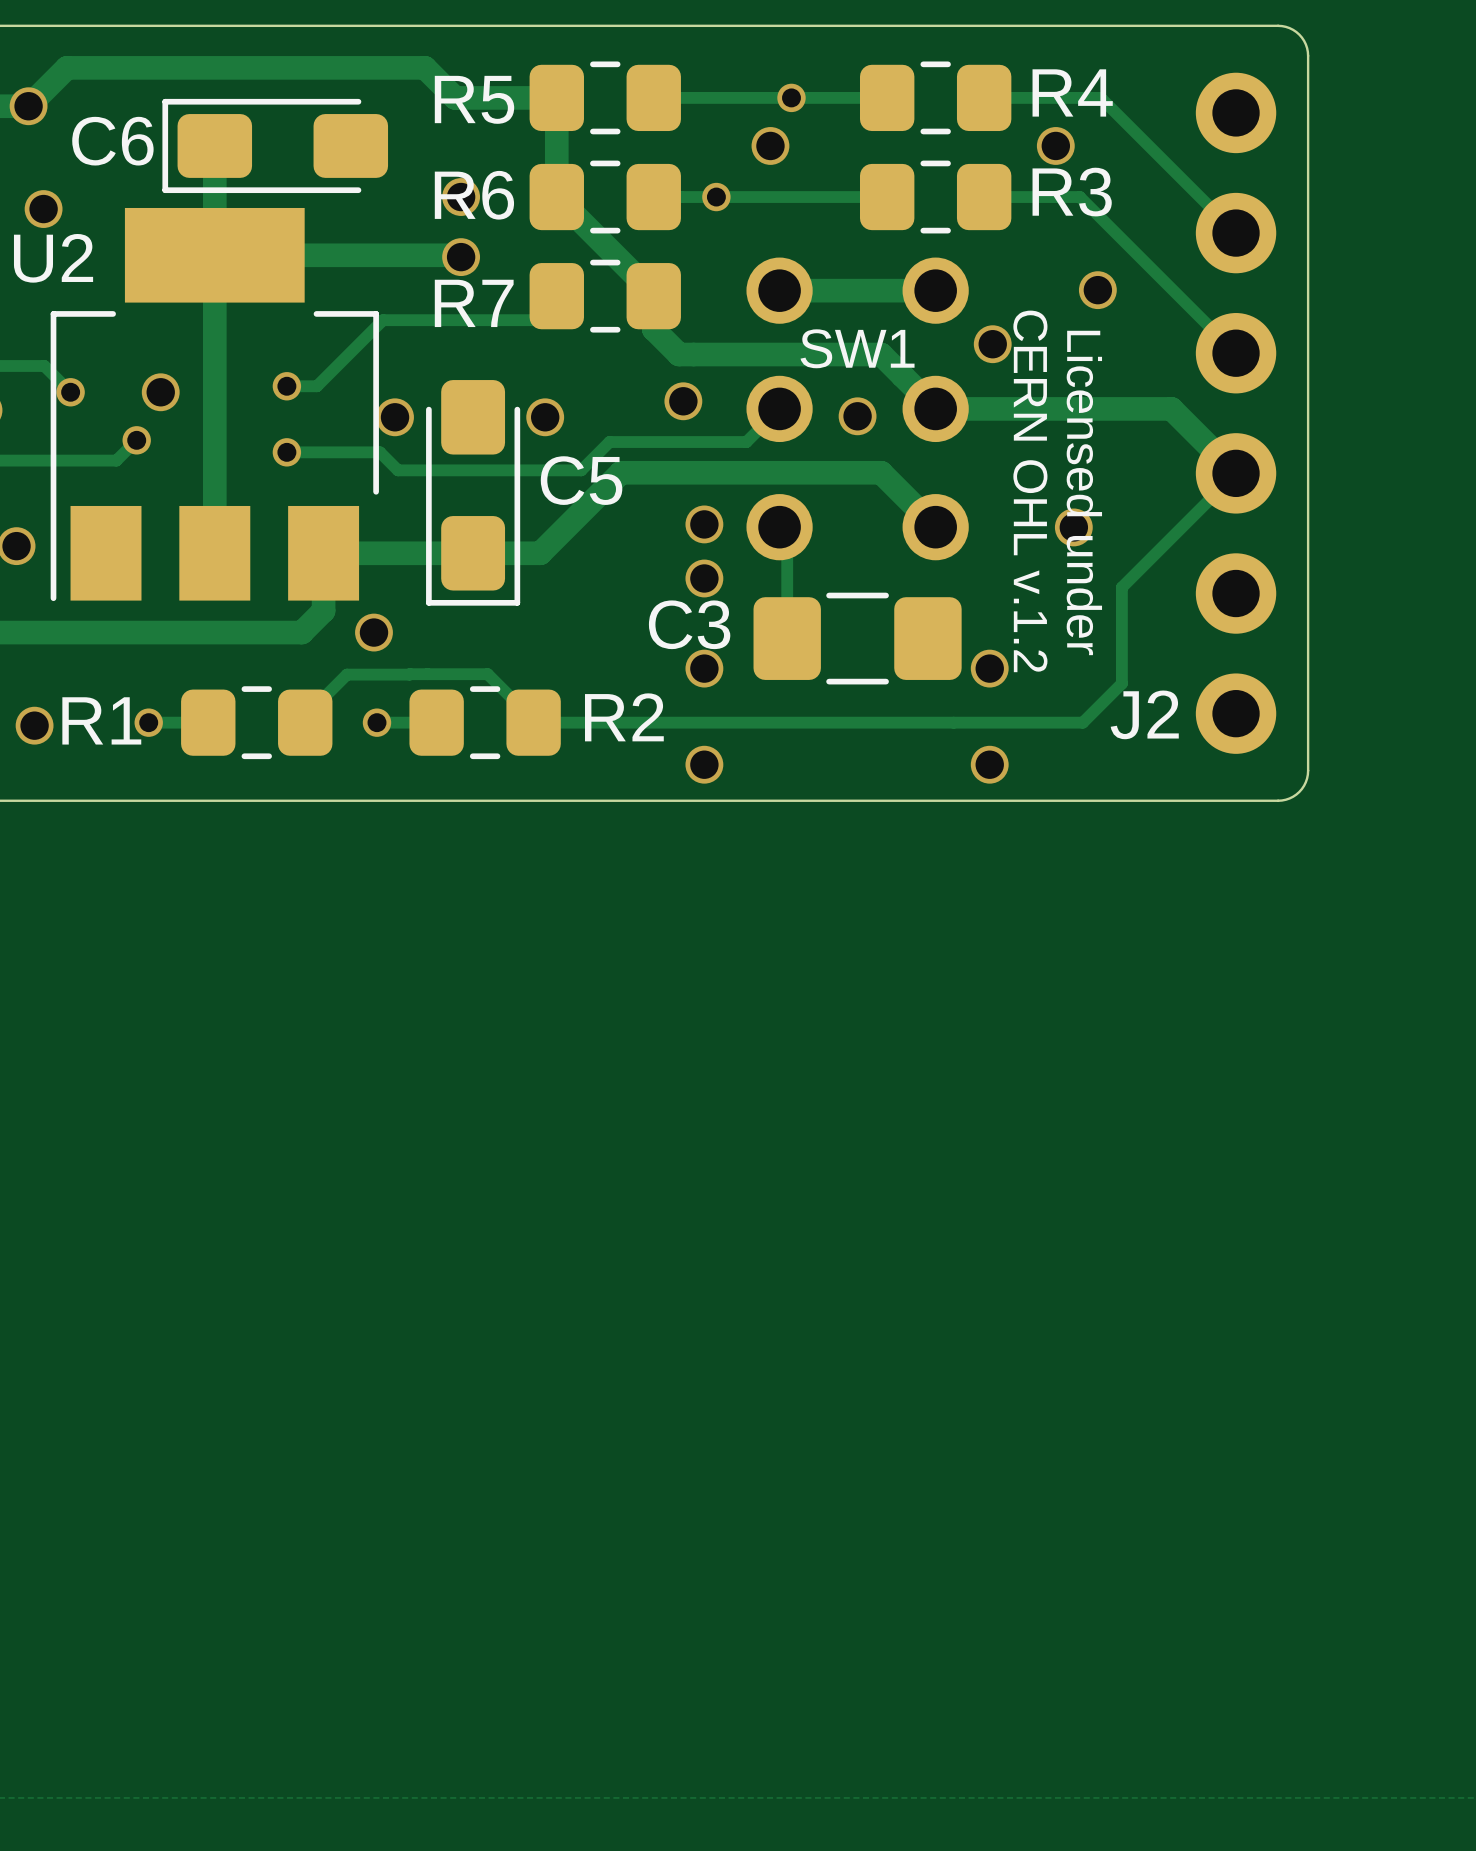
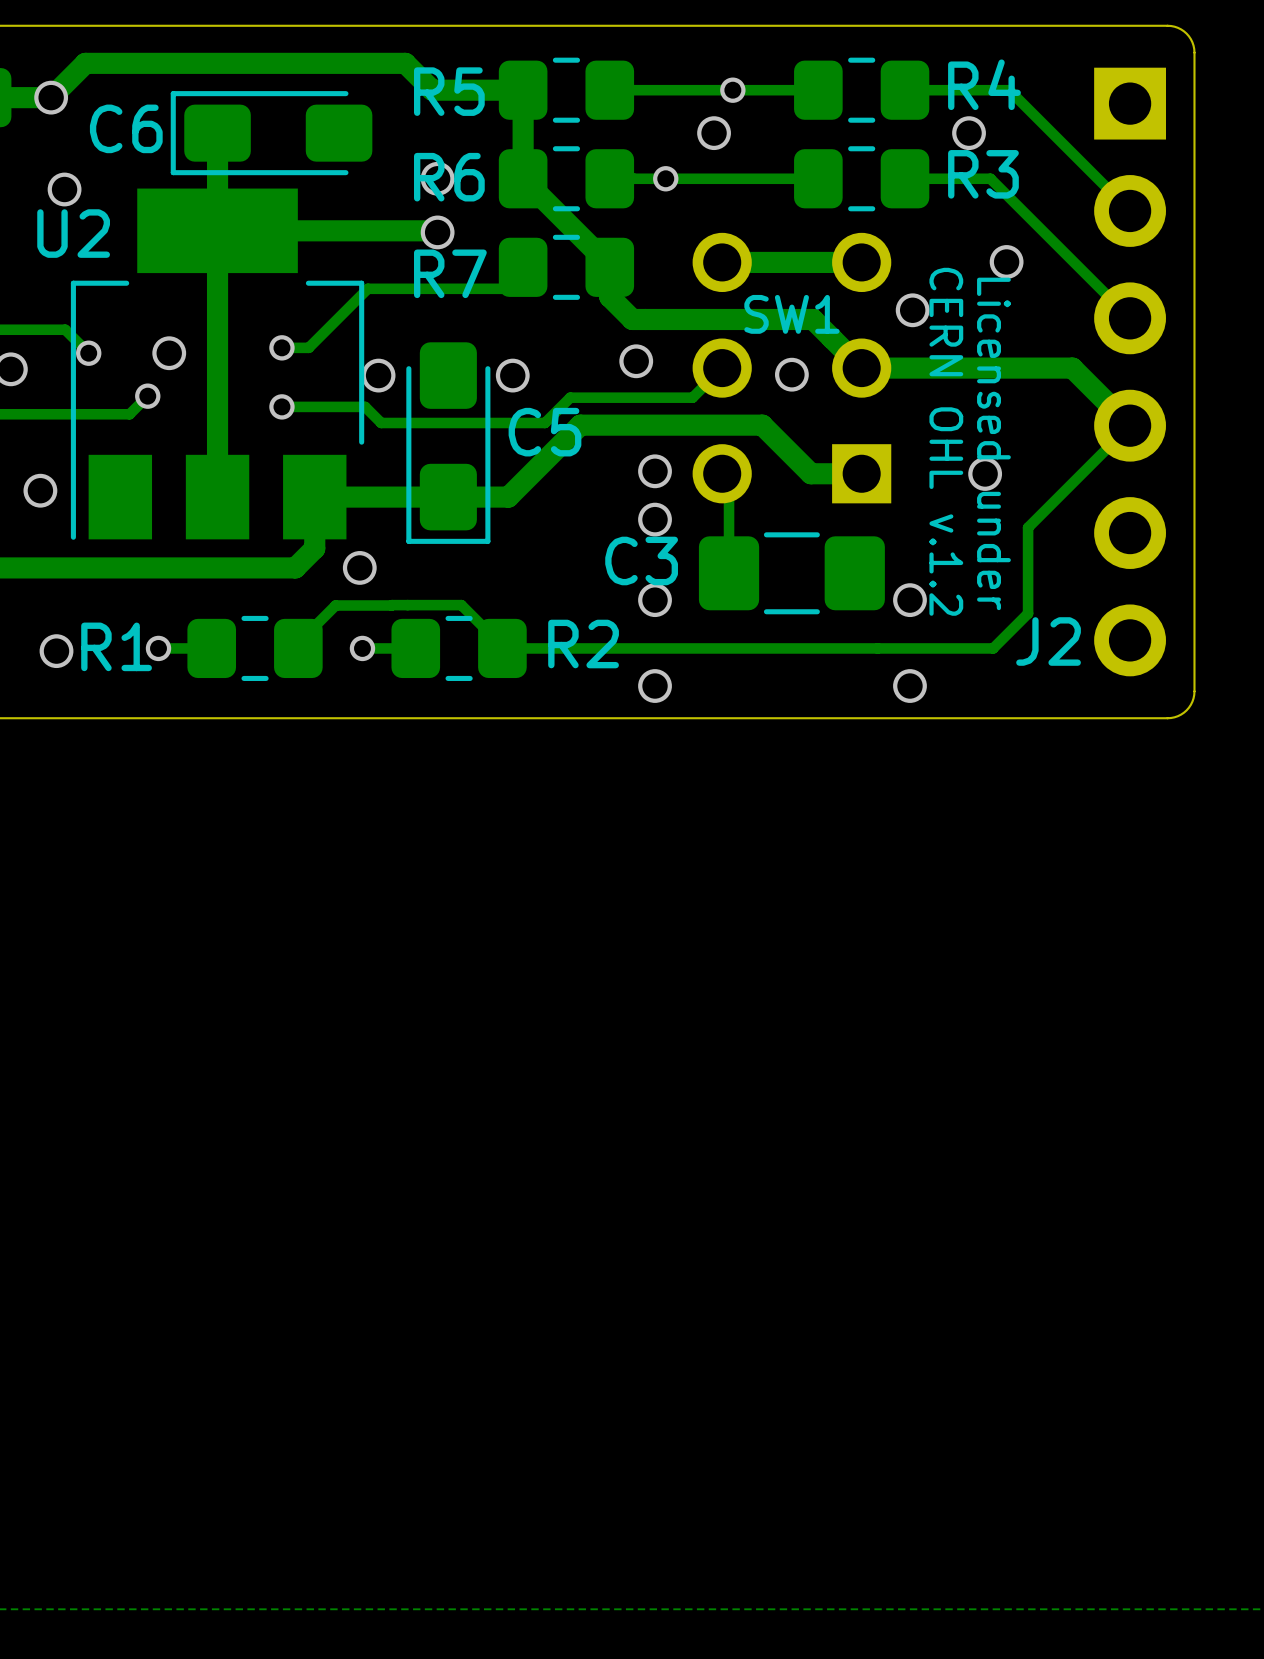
J2 footprint: [1195, 72, 1277, 754] -> [1094, 67, 1166, 677]
SW1 footprint: [746, 257, 969, 561] -> [692, 232, 892, 504]
track: (824, 472) (881, 472) (935, 527) -> (762, 425) (810, 473) (861, 473)

